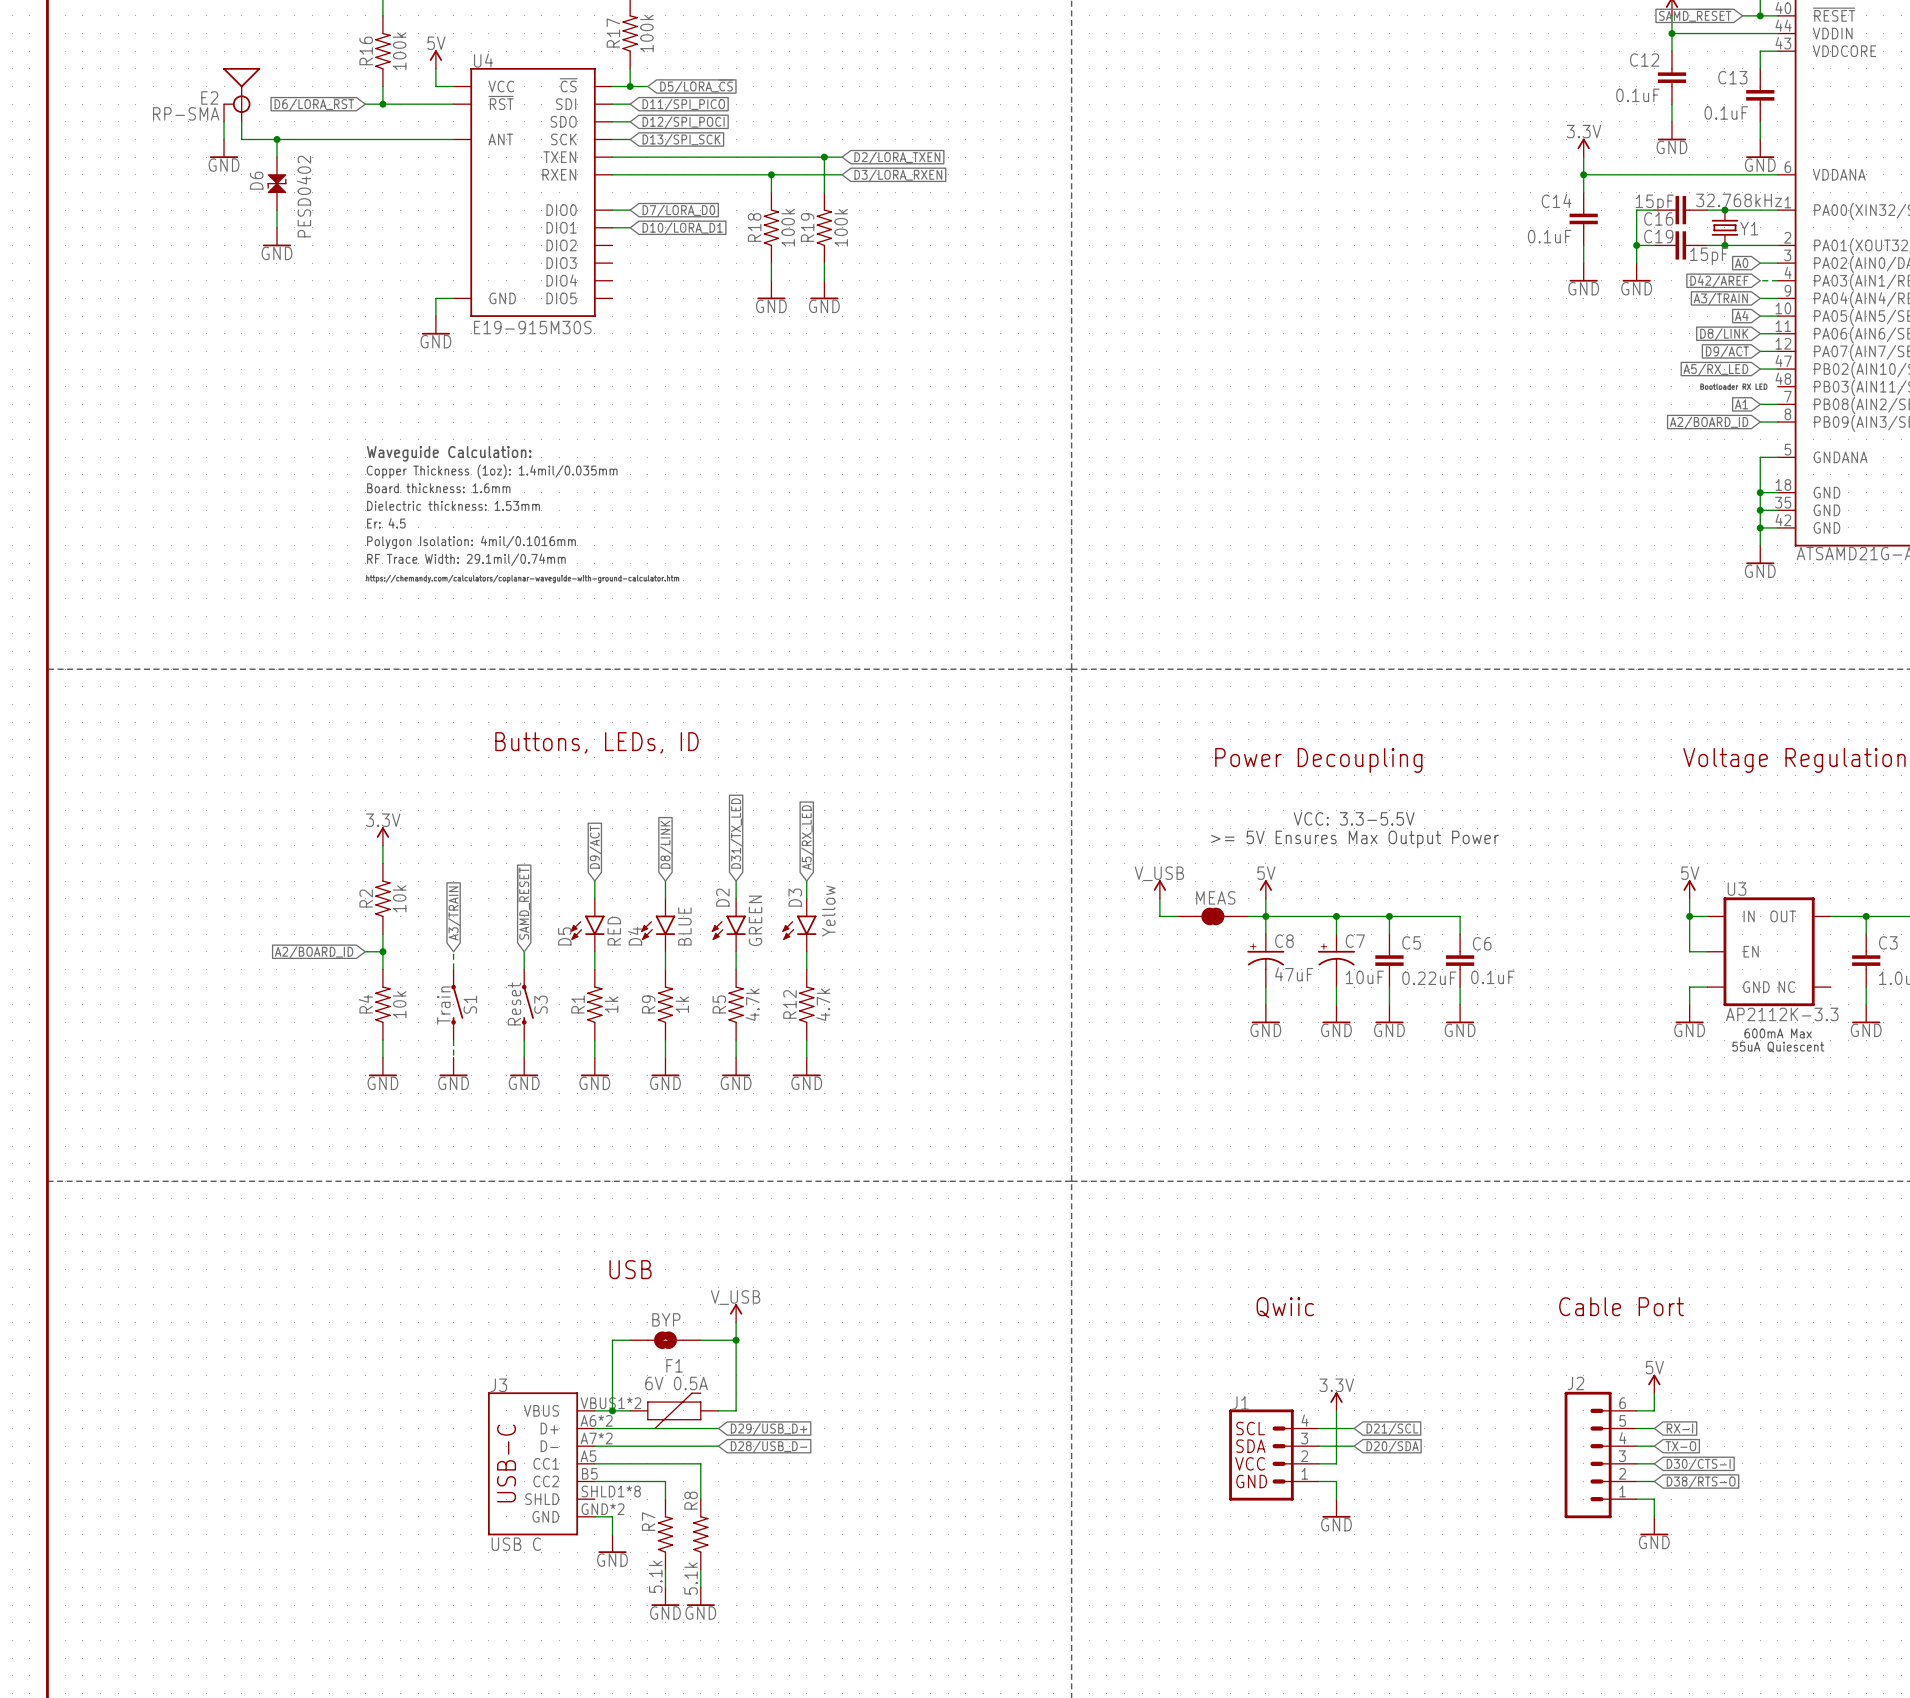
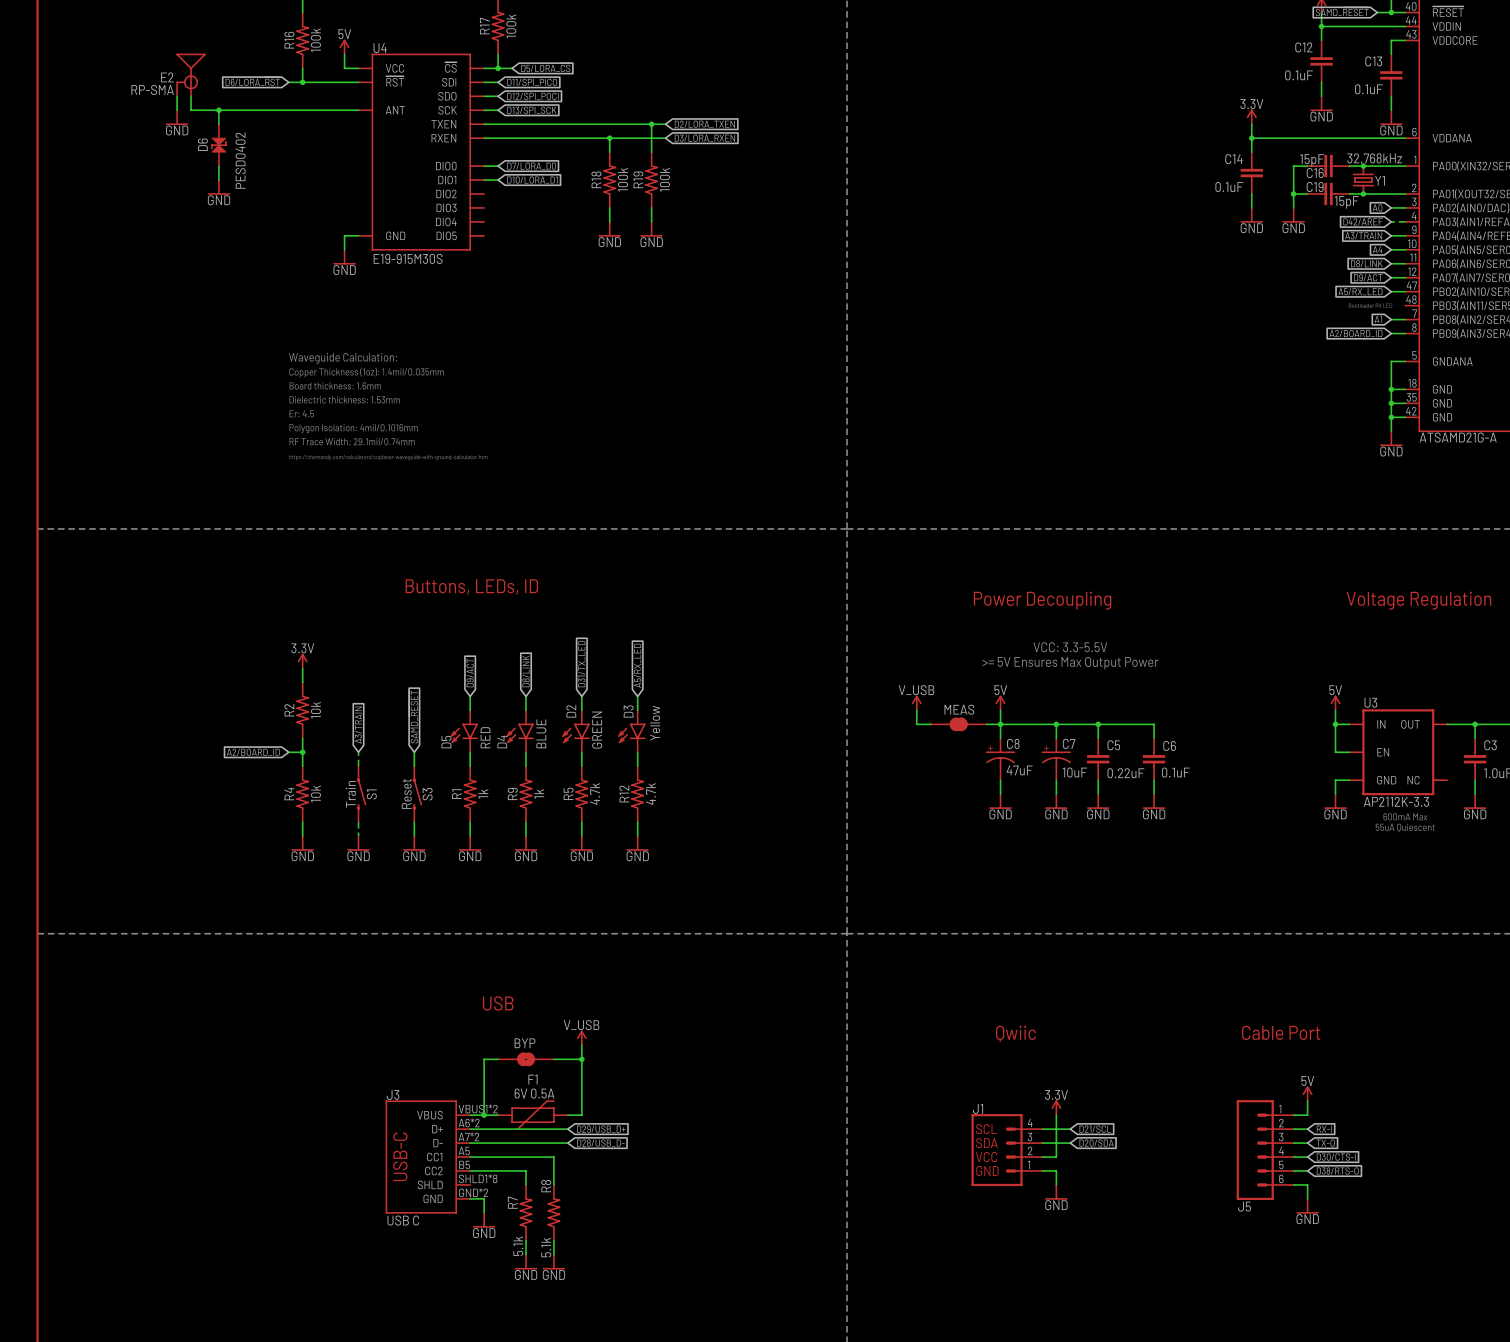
J2 name: J2 (1575, 1383) -> J5 (1244, 1206)
J2 flip: as is (1588, 1455) -> up-down (1255, 1150)

